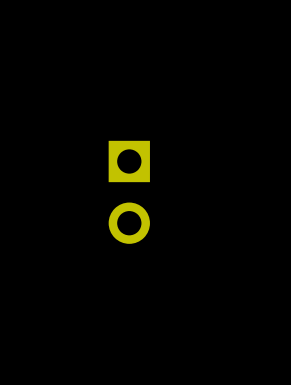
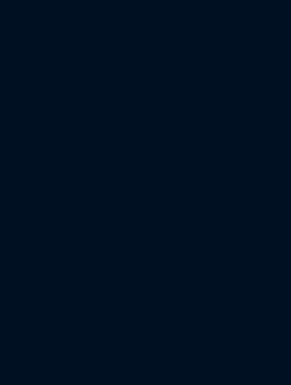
part: (129, 192) -> none

